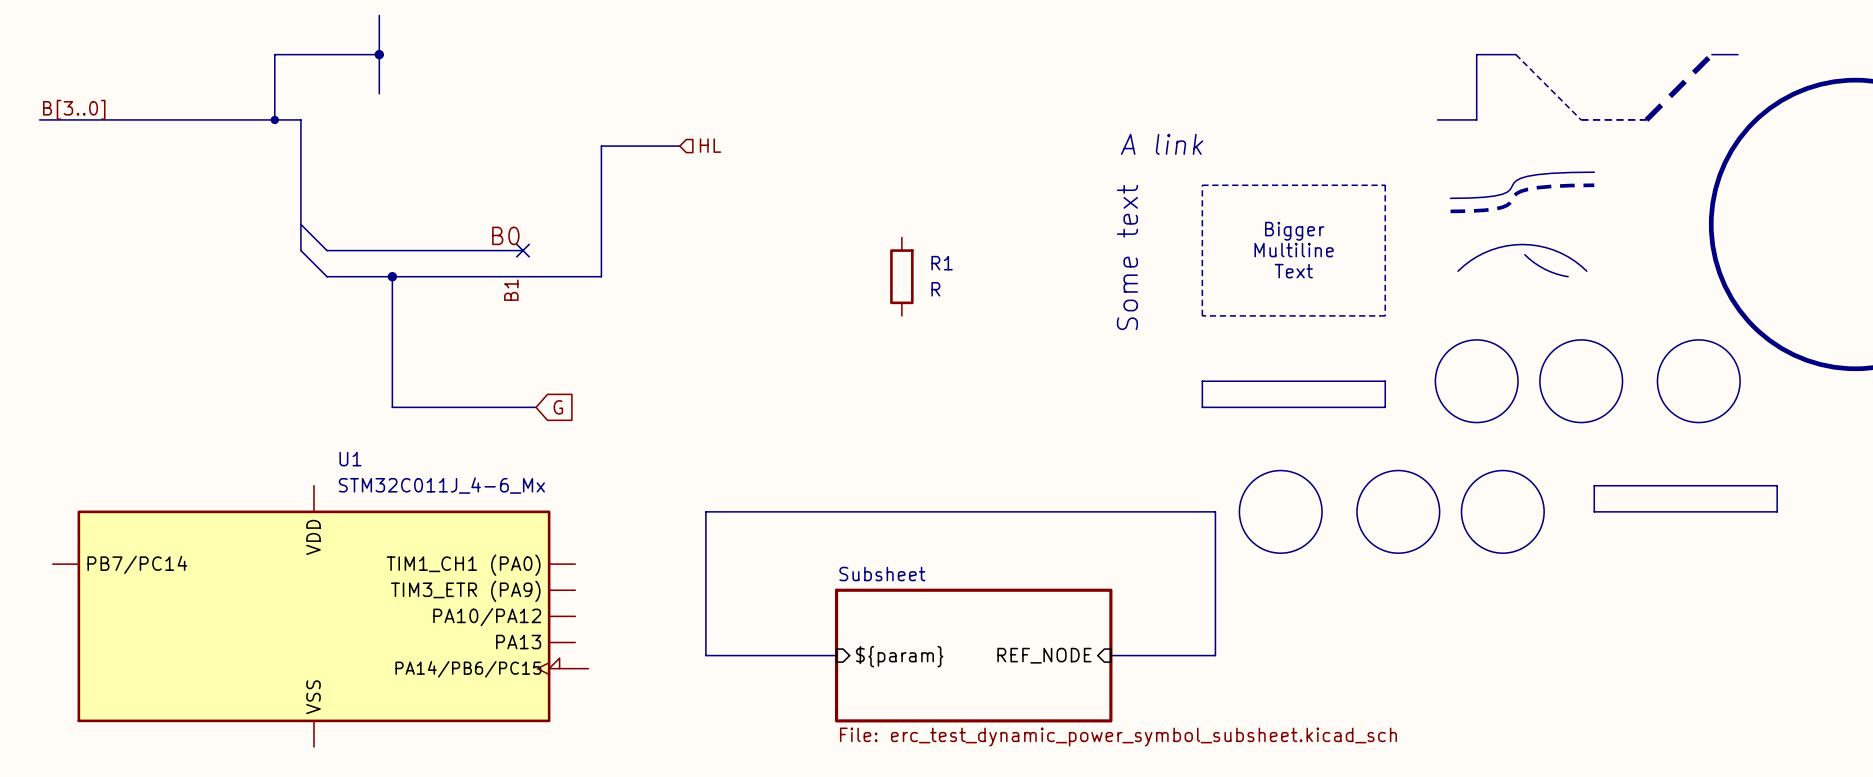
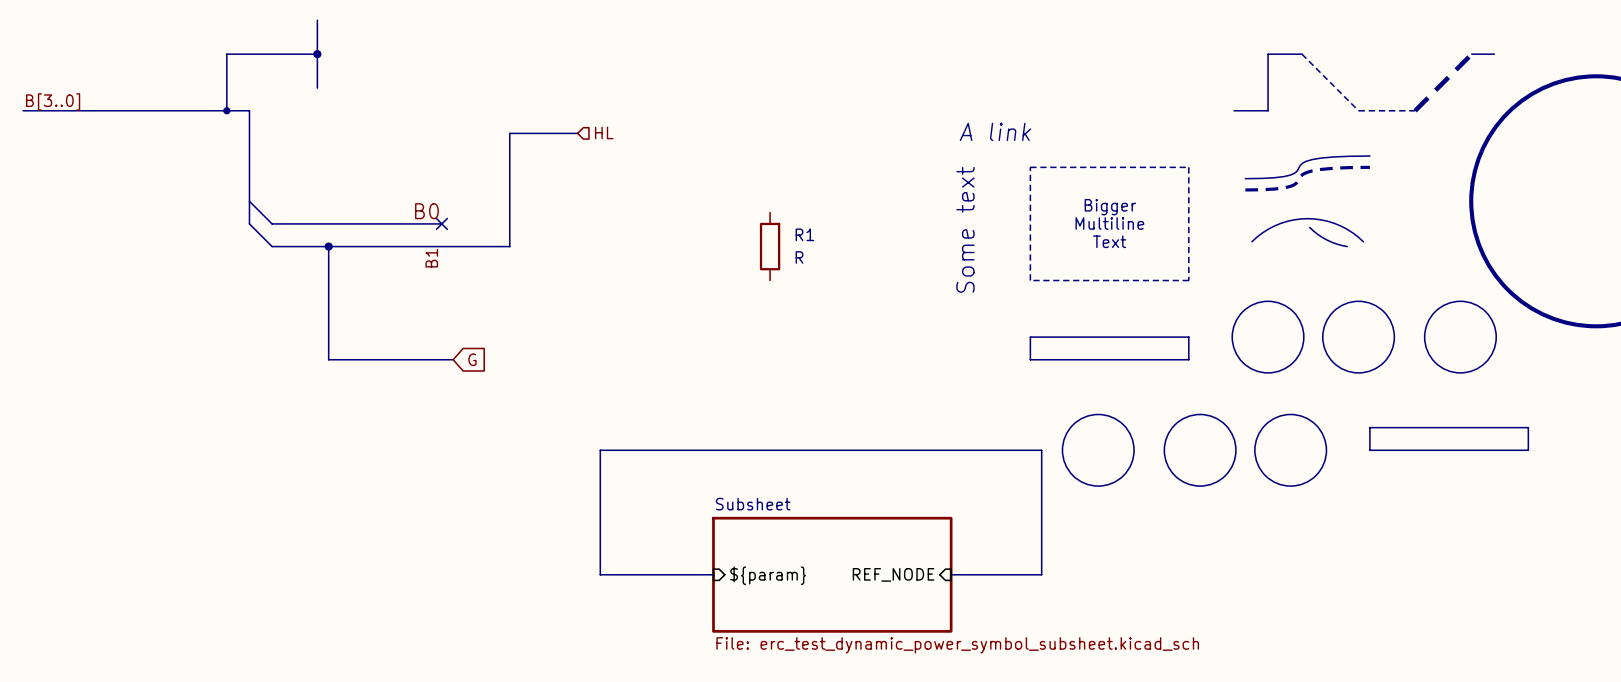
U1: STM32C011J_4-6_Mx (320, 616) -> none

